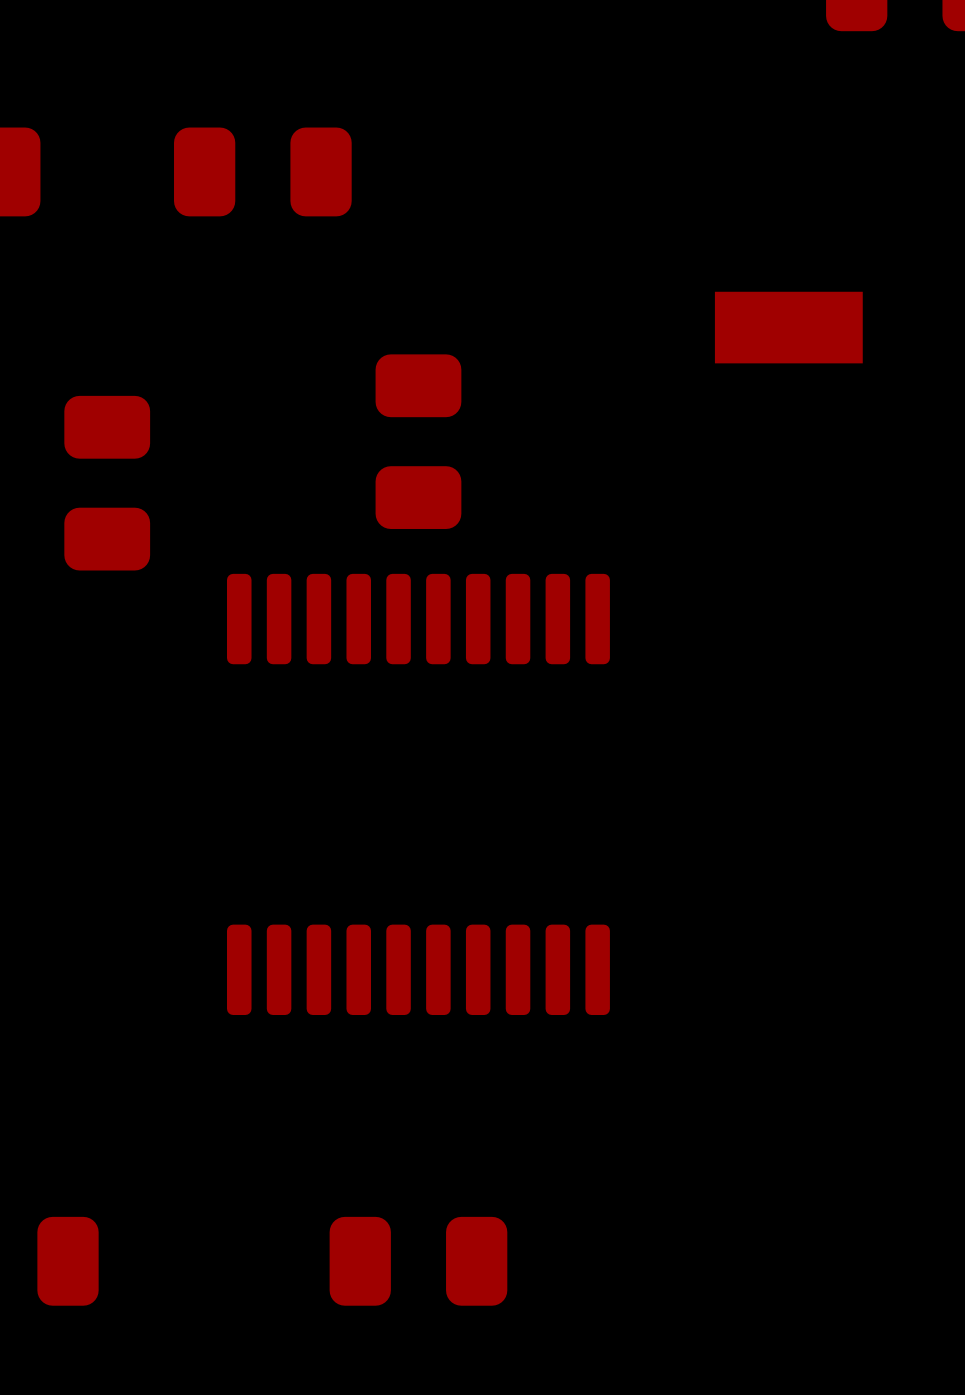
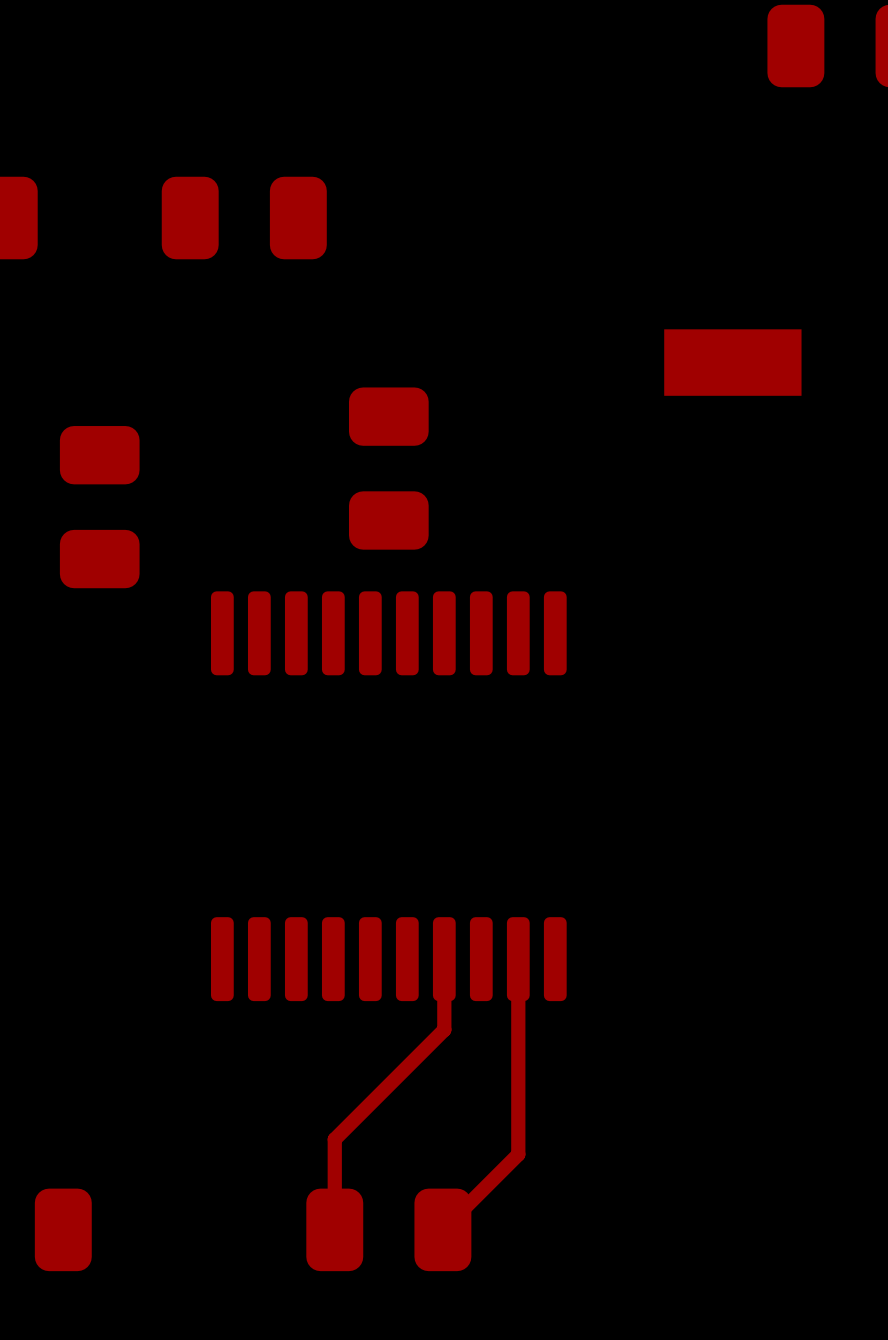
top track: none -> (444, 959) (444, 1029) (334, 1139) (334, 1229)
top track: none -> (518, 959) (518, 1154) (442, 1229)

